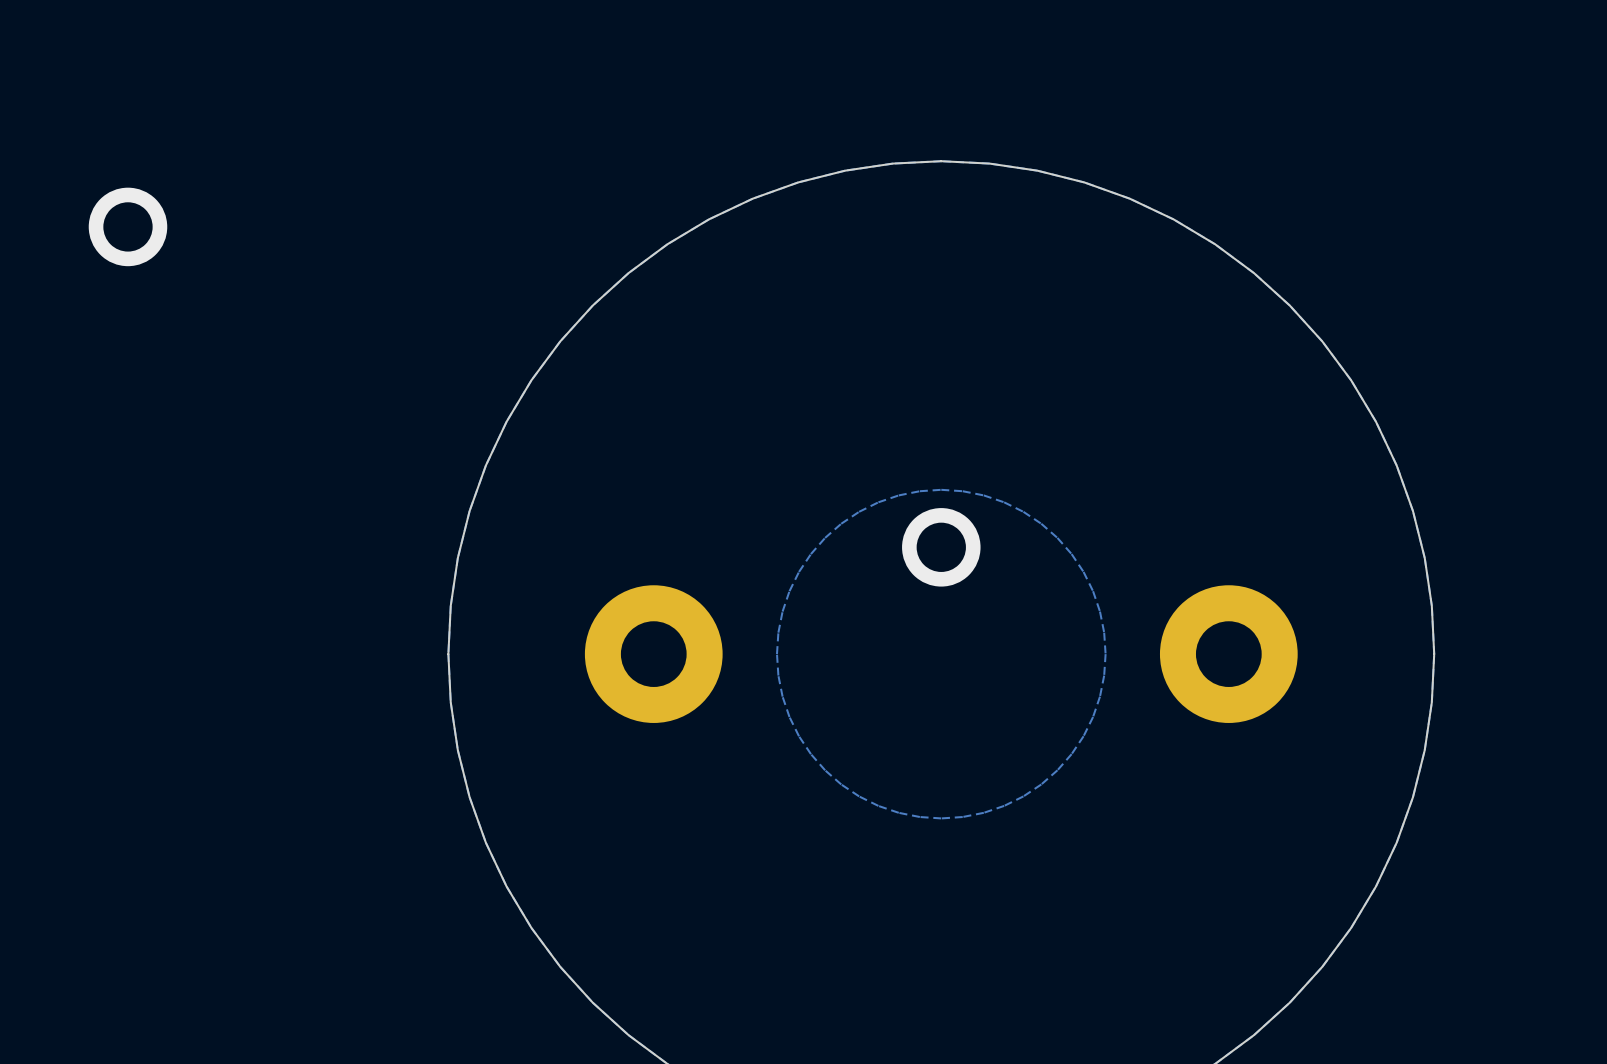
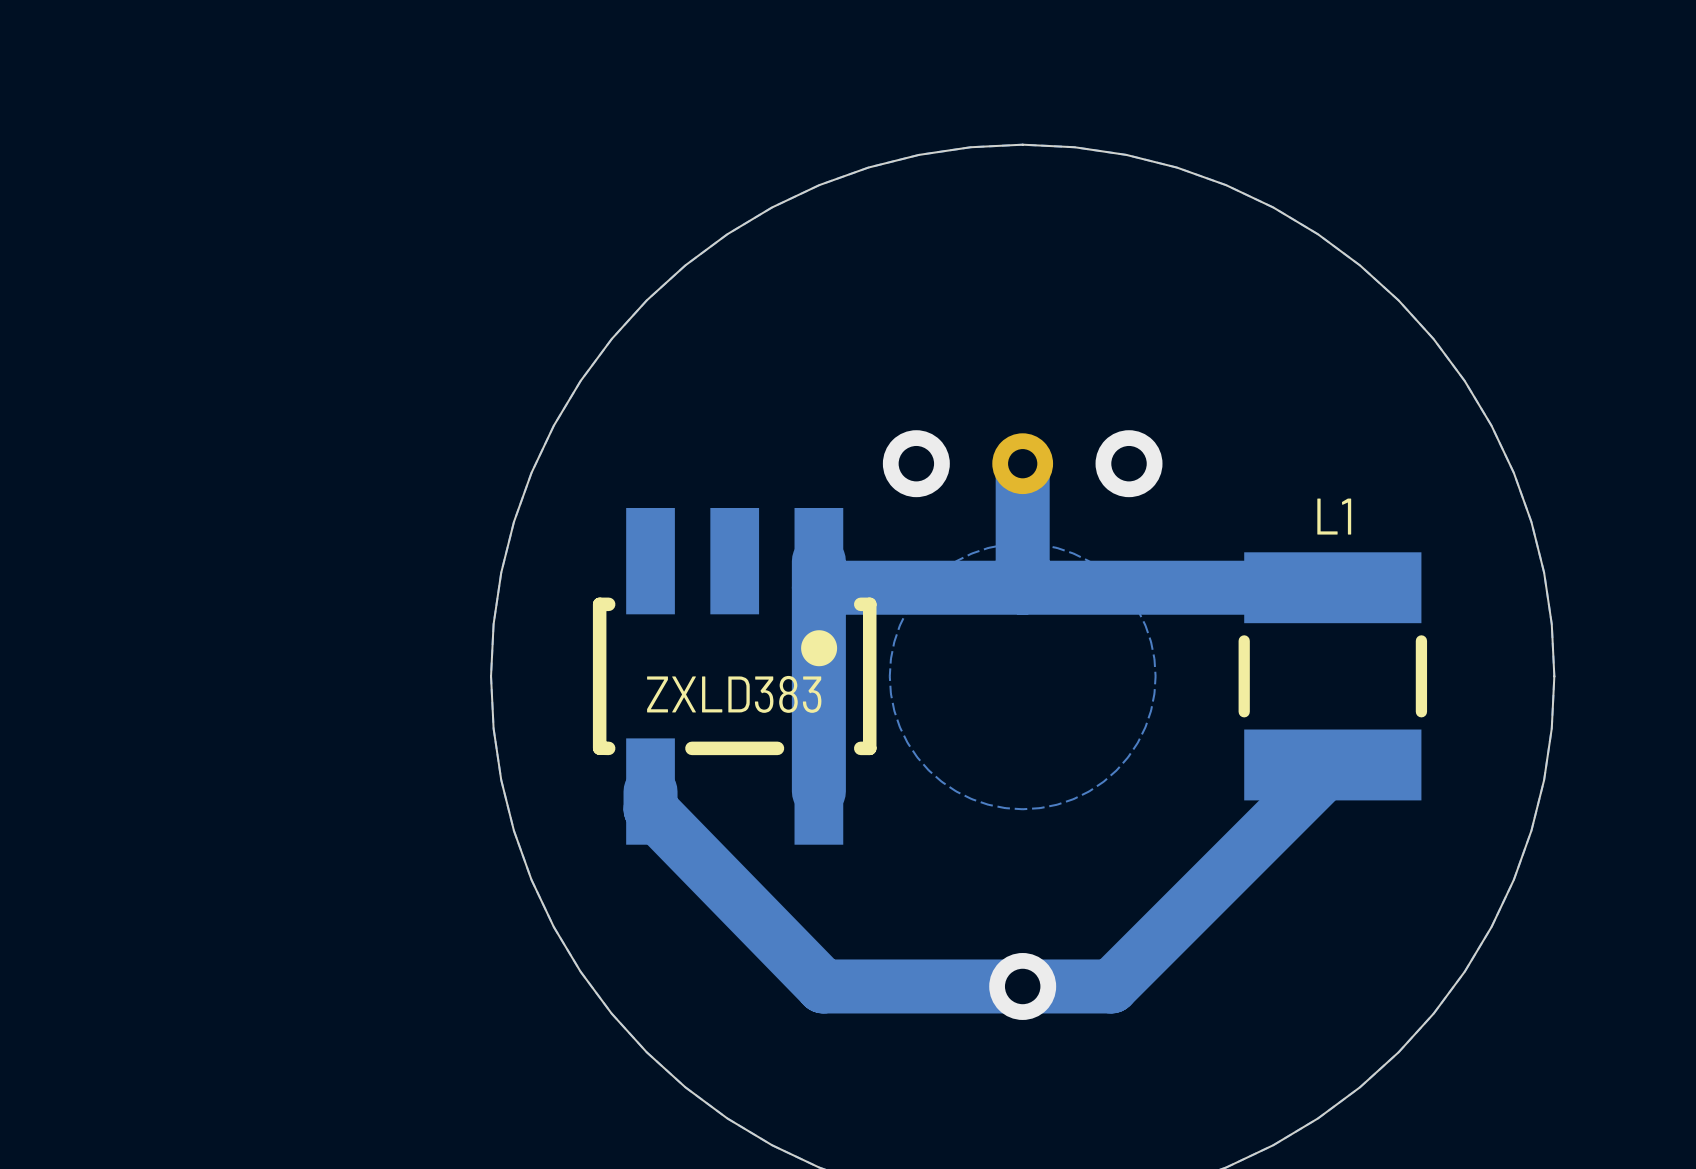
via: (127, 226) -> none
via: none -> (916, 463)
track: none -> (1022, 463) (1022, 587)
part: none -> (1022, 463)
via: none -> (1129, 463)
zone outline: (941, 489) (962, 491) (1004, 502) (1023, 511) (1057, 537) (1083, 571) (1093, 591) (1104, 632) (1105, 654) (1104, 675) (1093, 716) (1083, 736) (1057, 770) (1023, 796) (1004, 805) (962, 817) (941, 818) (919, 817) (878, 805) (859, 796) (825, 770) (799, 736) (789, 716) (778, 675) (776, 654) (778, 632) (789, 591) (799, 571) (825, 537) (859, 511) (878, 502) (919, 491) (941, 489) -> (1022, 543) (1057, 547) (1073, 553) (1103, 570) (1116, 582) (1128, 595) (1145, 625) (1151, 641) (1155, 676) (1151, 710) (1145, 727) (1128, 757) (1116, 770) (1103, 781) (1073, 799) (1057, 804) (1022, 809) (988, 804) (971, 799) (941, 781) (928, 770) (917, 757) (899, 727) (894, 710) (889, 676) (894, 641) (899, 625) (917, 595) (928, 582) (941, 570) (971, 553) (988, 547) (1022, 543)
track: none -> (818, 561) (818, 791)
via: (941, 547) -> none
track: none -> (1332, 587) (818, 587)
part: (653, 654) -> none
ZXLD383: none -> (734, 676)
part: (1228, 654) -> none
L1: none -> (1332, 676)
track: none -> (1332, 764) (1111, 986) (823, 986) (650, 809) (650, 791)
via: none -> (1022, 986)

